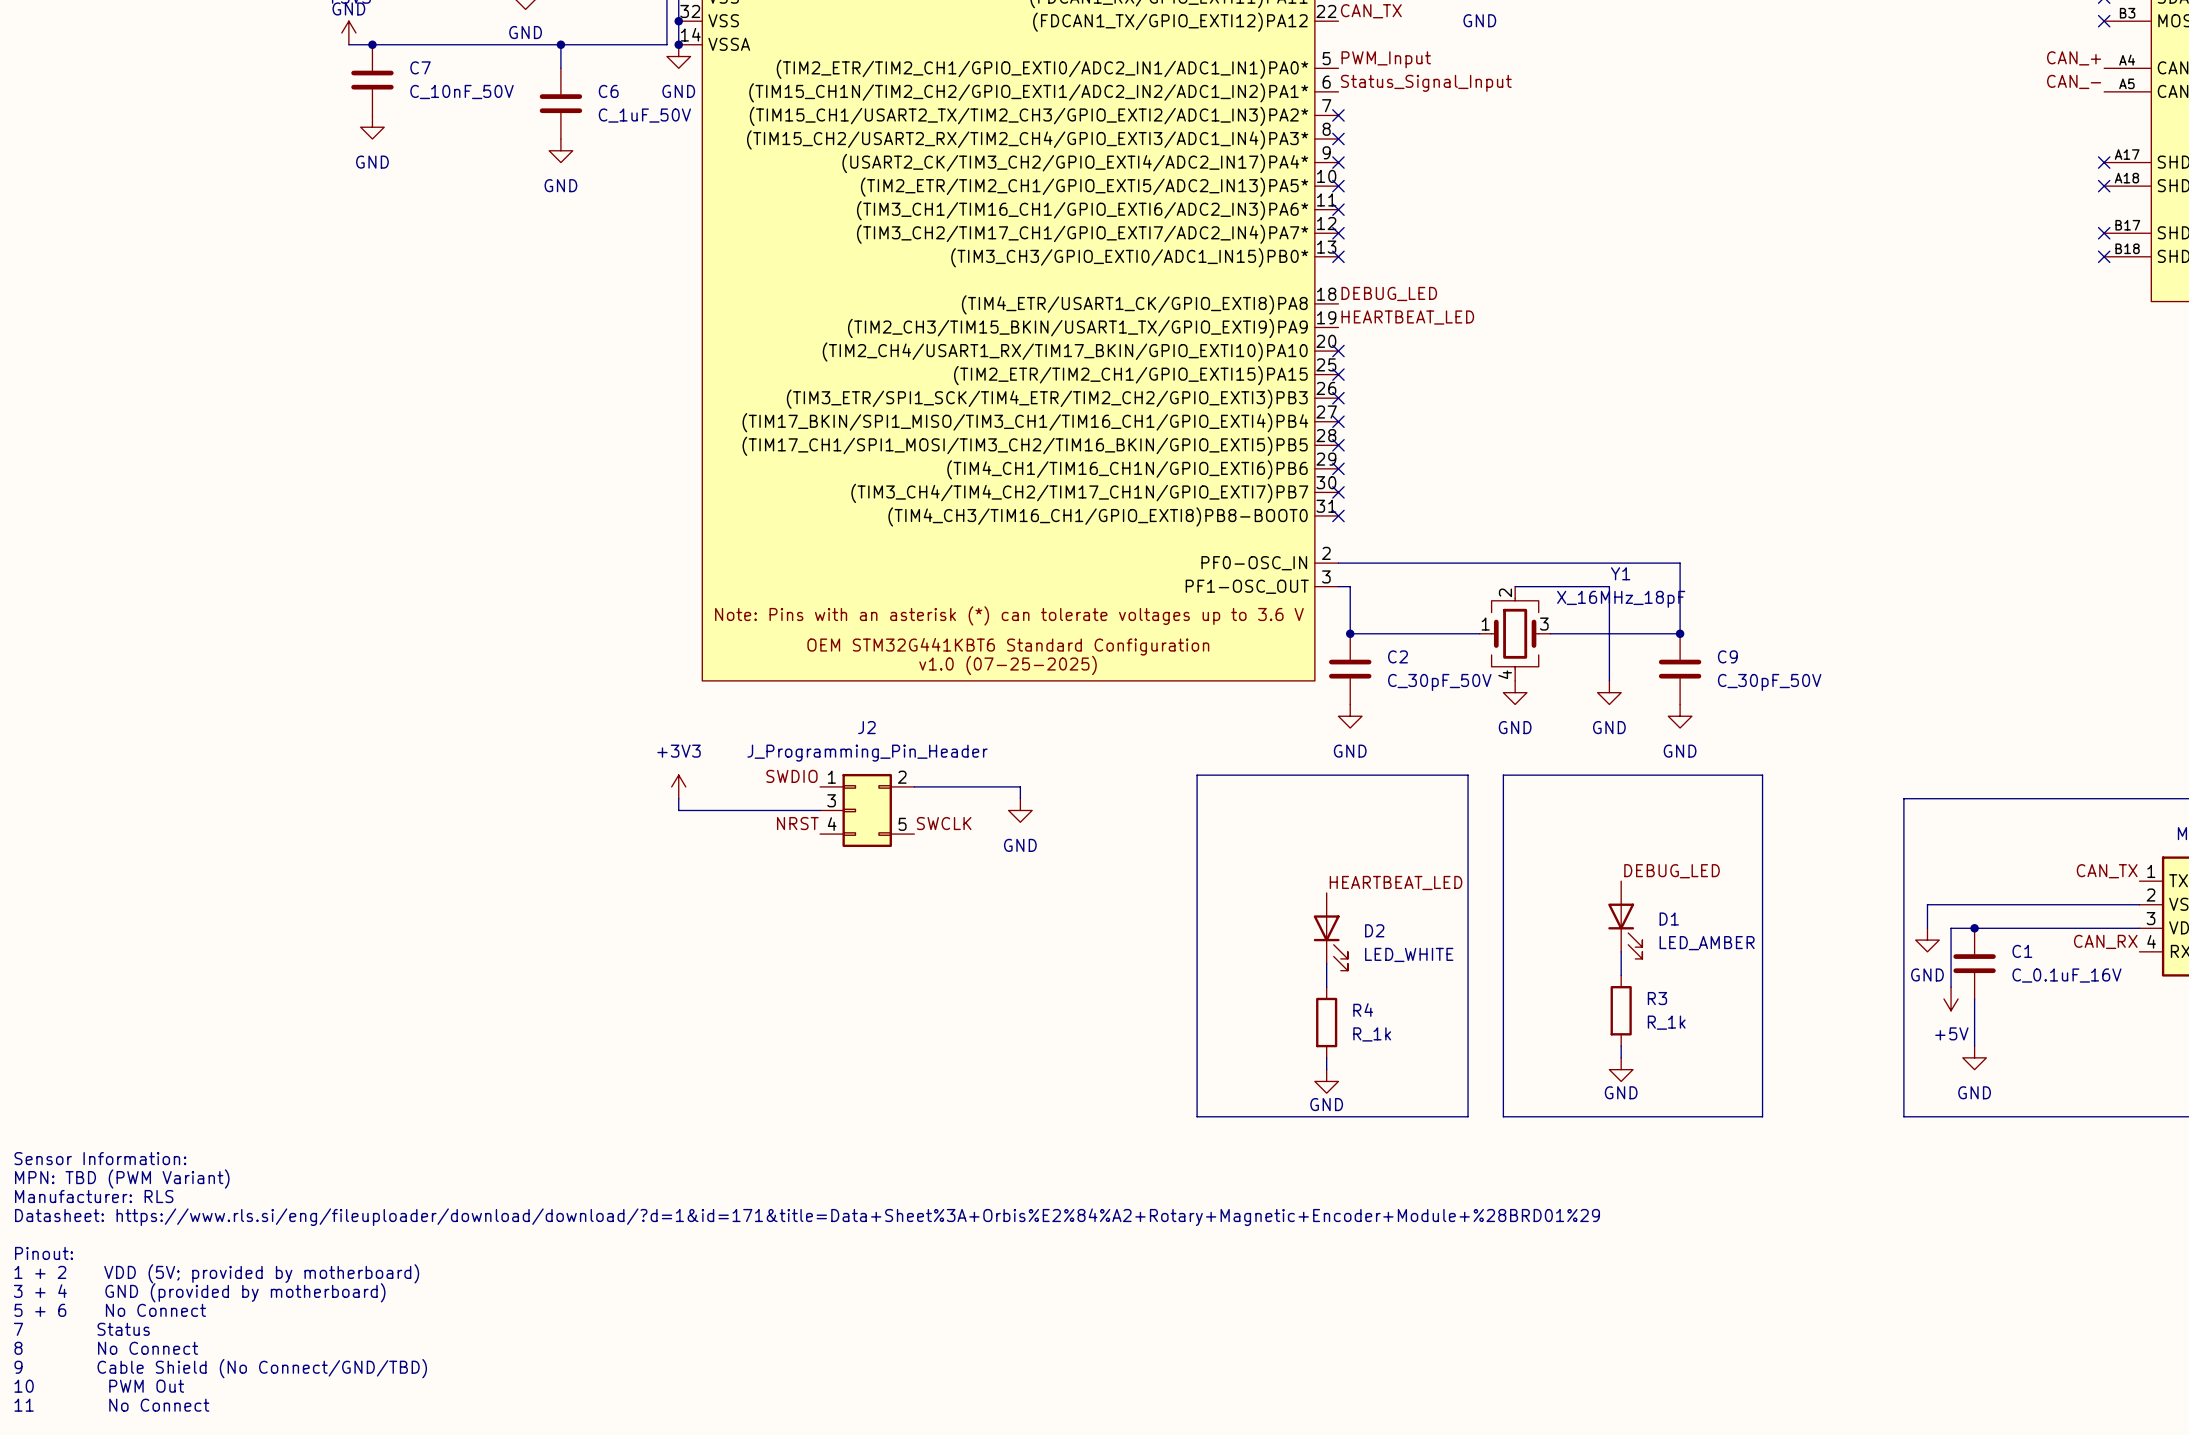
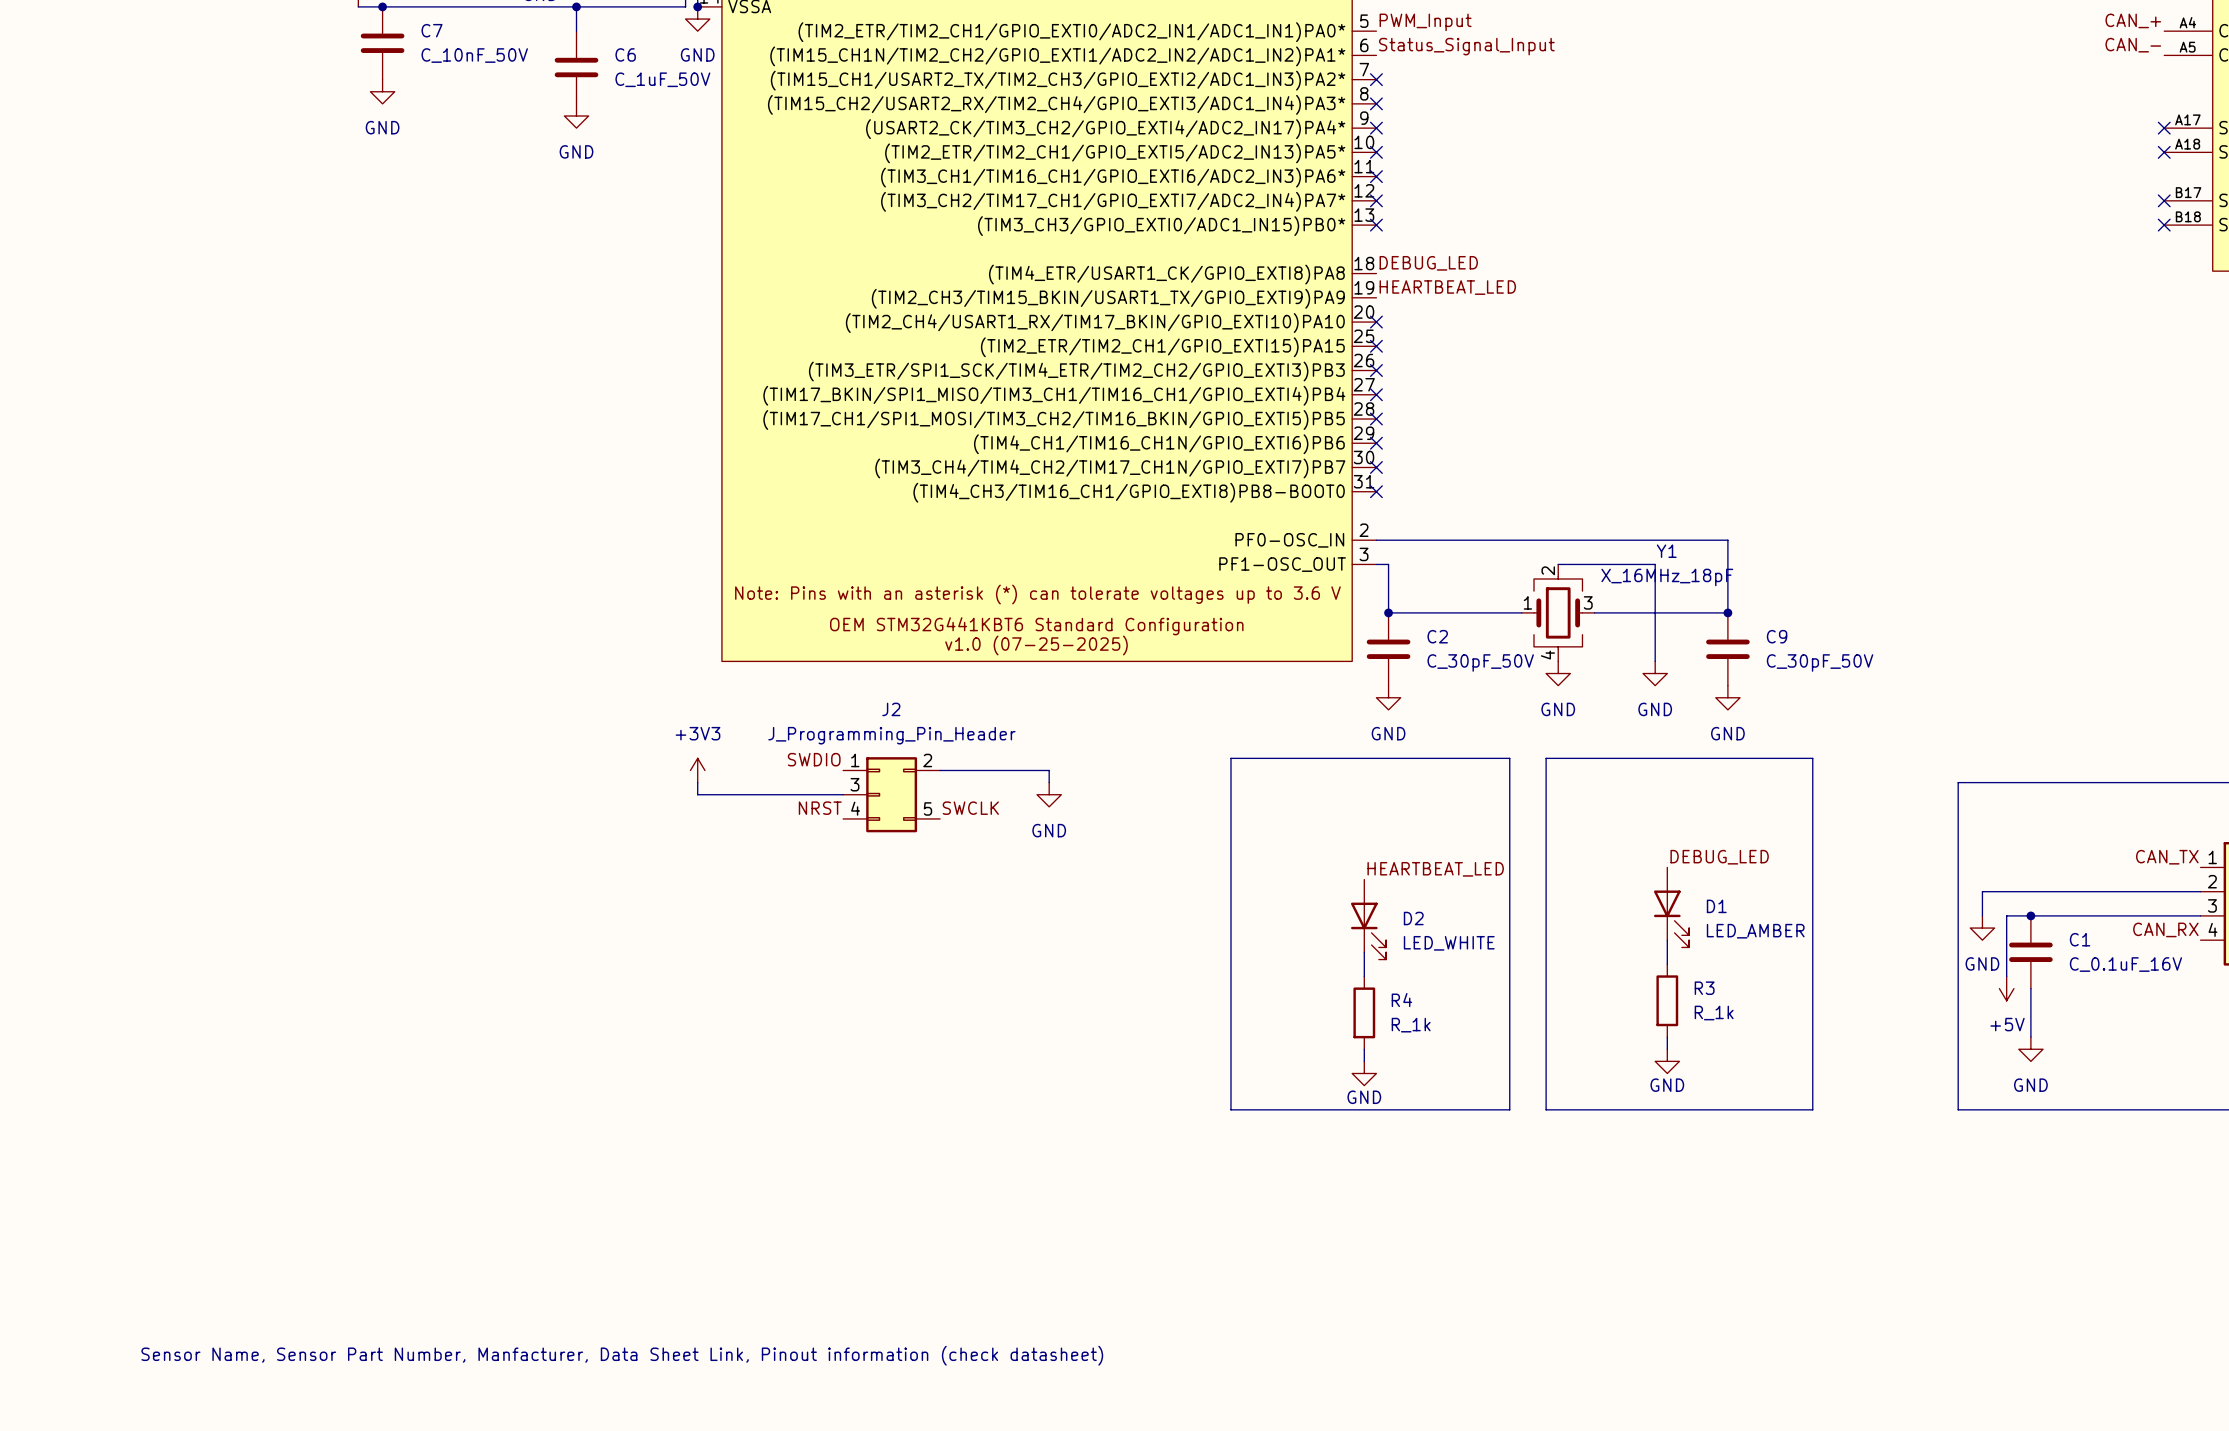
text: Sensor Information: (100, 1158) -> none
text: MPN: TBD (PWM Variant) (122, 1178) -> none
text: Manufacturer: RLS (94, 1196) -> none
text: Datasheet: https://www.rls.si/eng/fileuploader/download/download/?d=1&id=171&title=Data+Sheet%3A+Orbis%E2%84%A2+Rotary+Magnetic+Encoder+Module+%28BRD01%29 (807, 1217) -> none
text: Pinout: (44, 1253) -> none
text: 1 + 2 VDD (5V; provided by motherboard) (216, 1273) -> none
text: 3 + 4 GND (provided by motherboard) (199, 1292) -> none
text: 5 + 6 No Connect (110, 1310) -> none
text: 7 Status (81, 1329) -> none
text: 8 No Connect (106, 1348) -> none
text: none -> Sensor Name, Sensor Part Number, Manfacturer, Data Sheet Link, Pinout information (check datasheet) (622, 1355)
text: 9 Cable Shield (No Connect/GND/TBD) (220, 1368) -> none
text: 10 PWM Out (99, 1386) -> none
text: 11 No Connect (111, 1405) -> none

